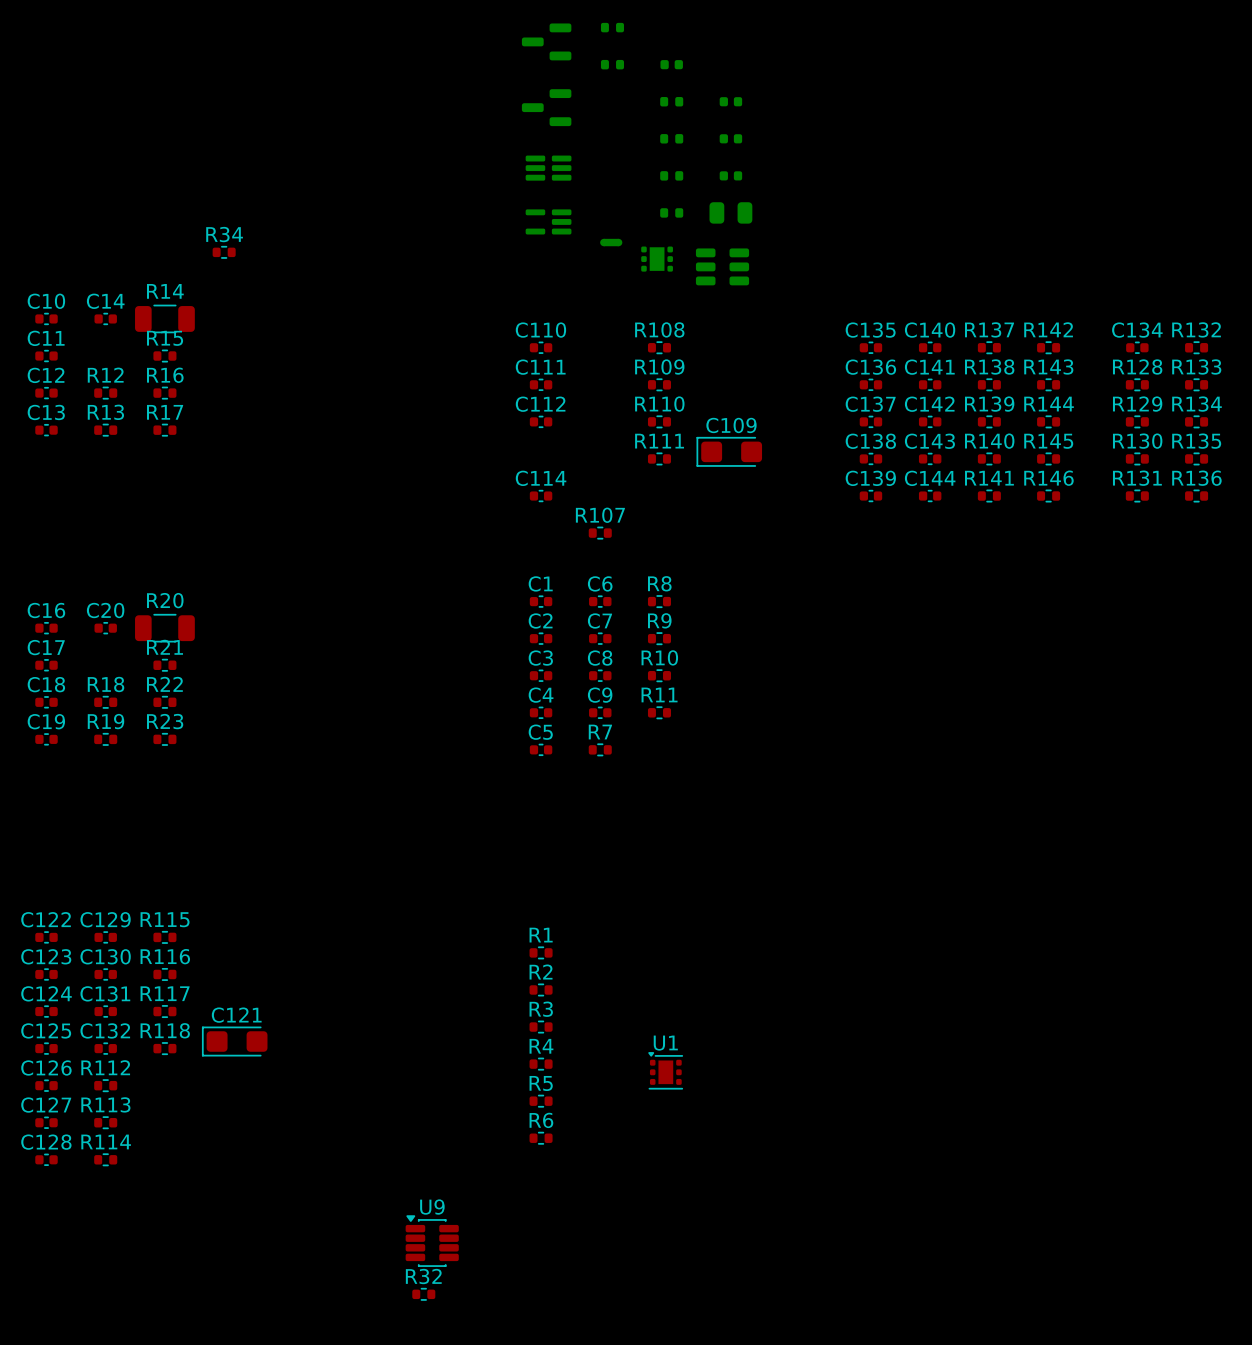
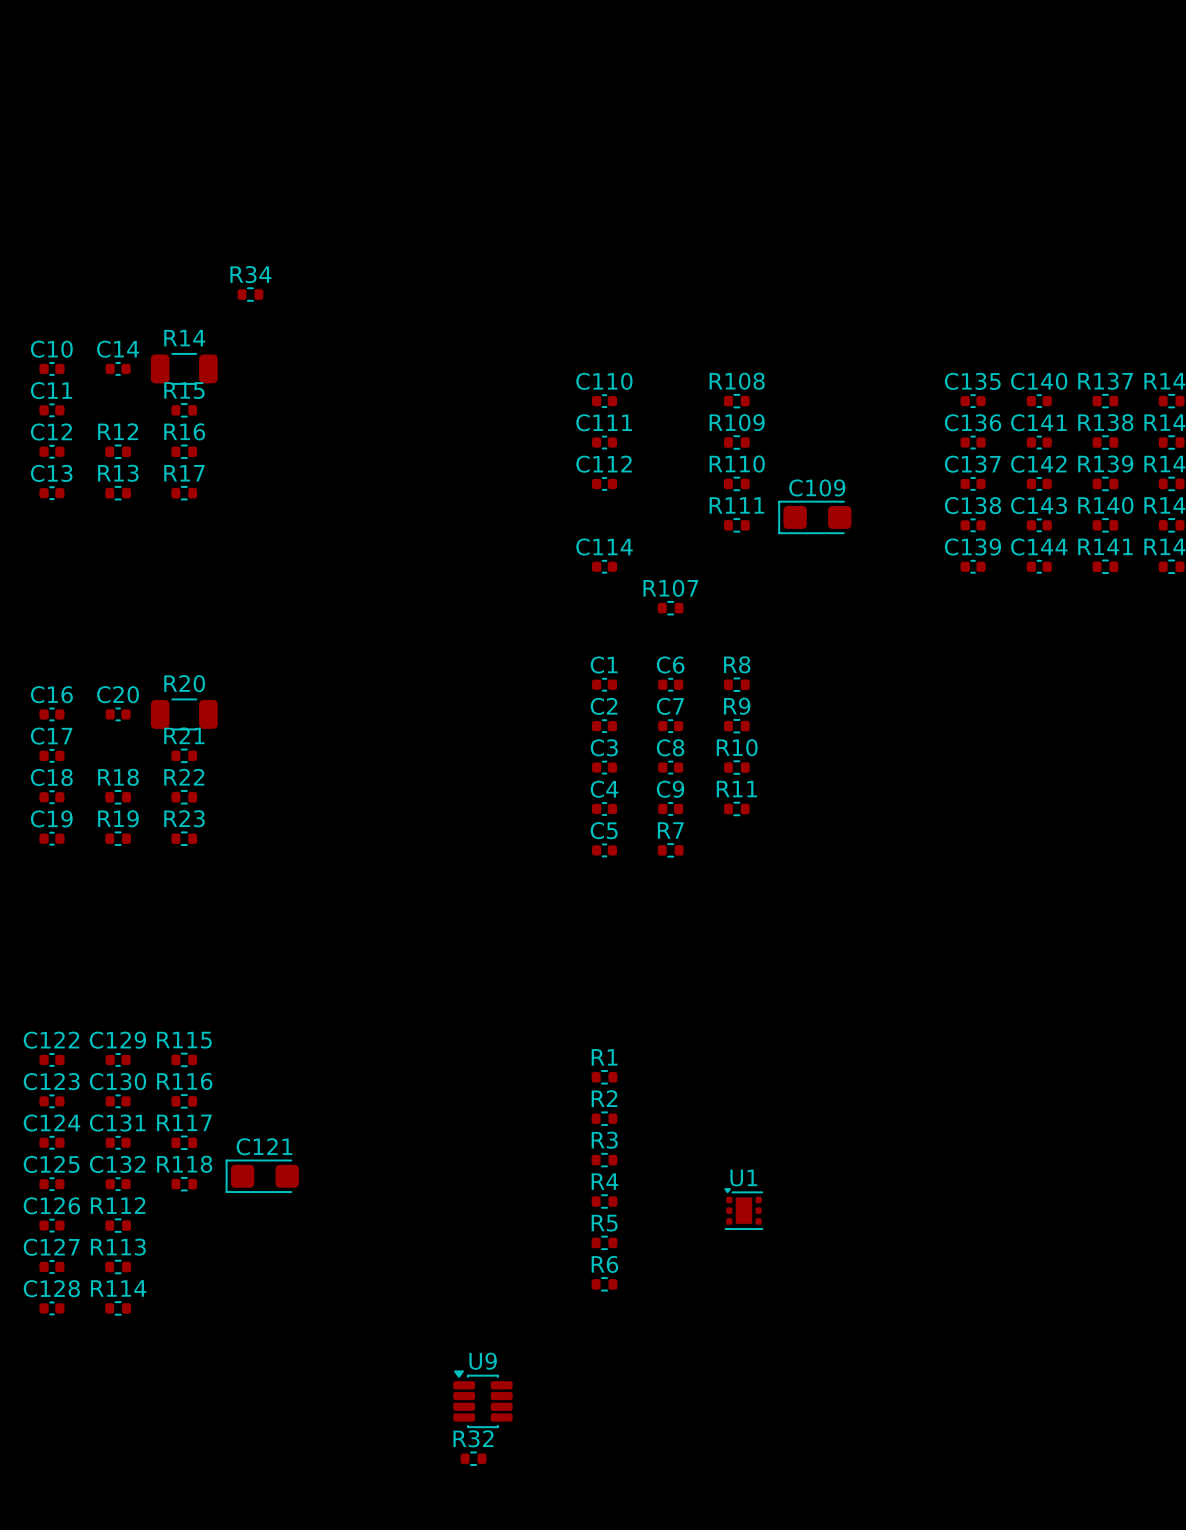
part: (612, 27) -> none
part: (546, 41) -> none
part: (612, 64) -> none
part: (671, 64) -> none
part: (671, 101) -> none
part: (730, 101) -> none
part: (546, 107) -> none
part: (671, 138) -> none
part: (730, 138) -> none
part: (548, 168) -> none
part: (671, 175) -> none
part: (730, 175) -> none
part: (671, 212) -> none
part: (730, 212) -> none
part: (548, 221) -> none
part: (611, 242) -> none
part: (657, 259) -> none
part: (722, 266) -> none

